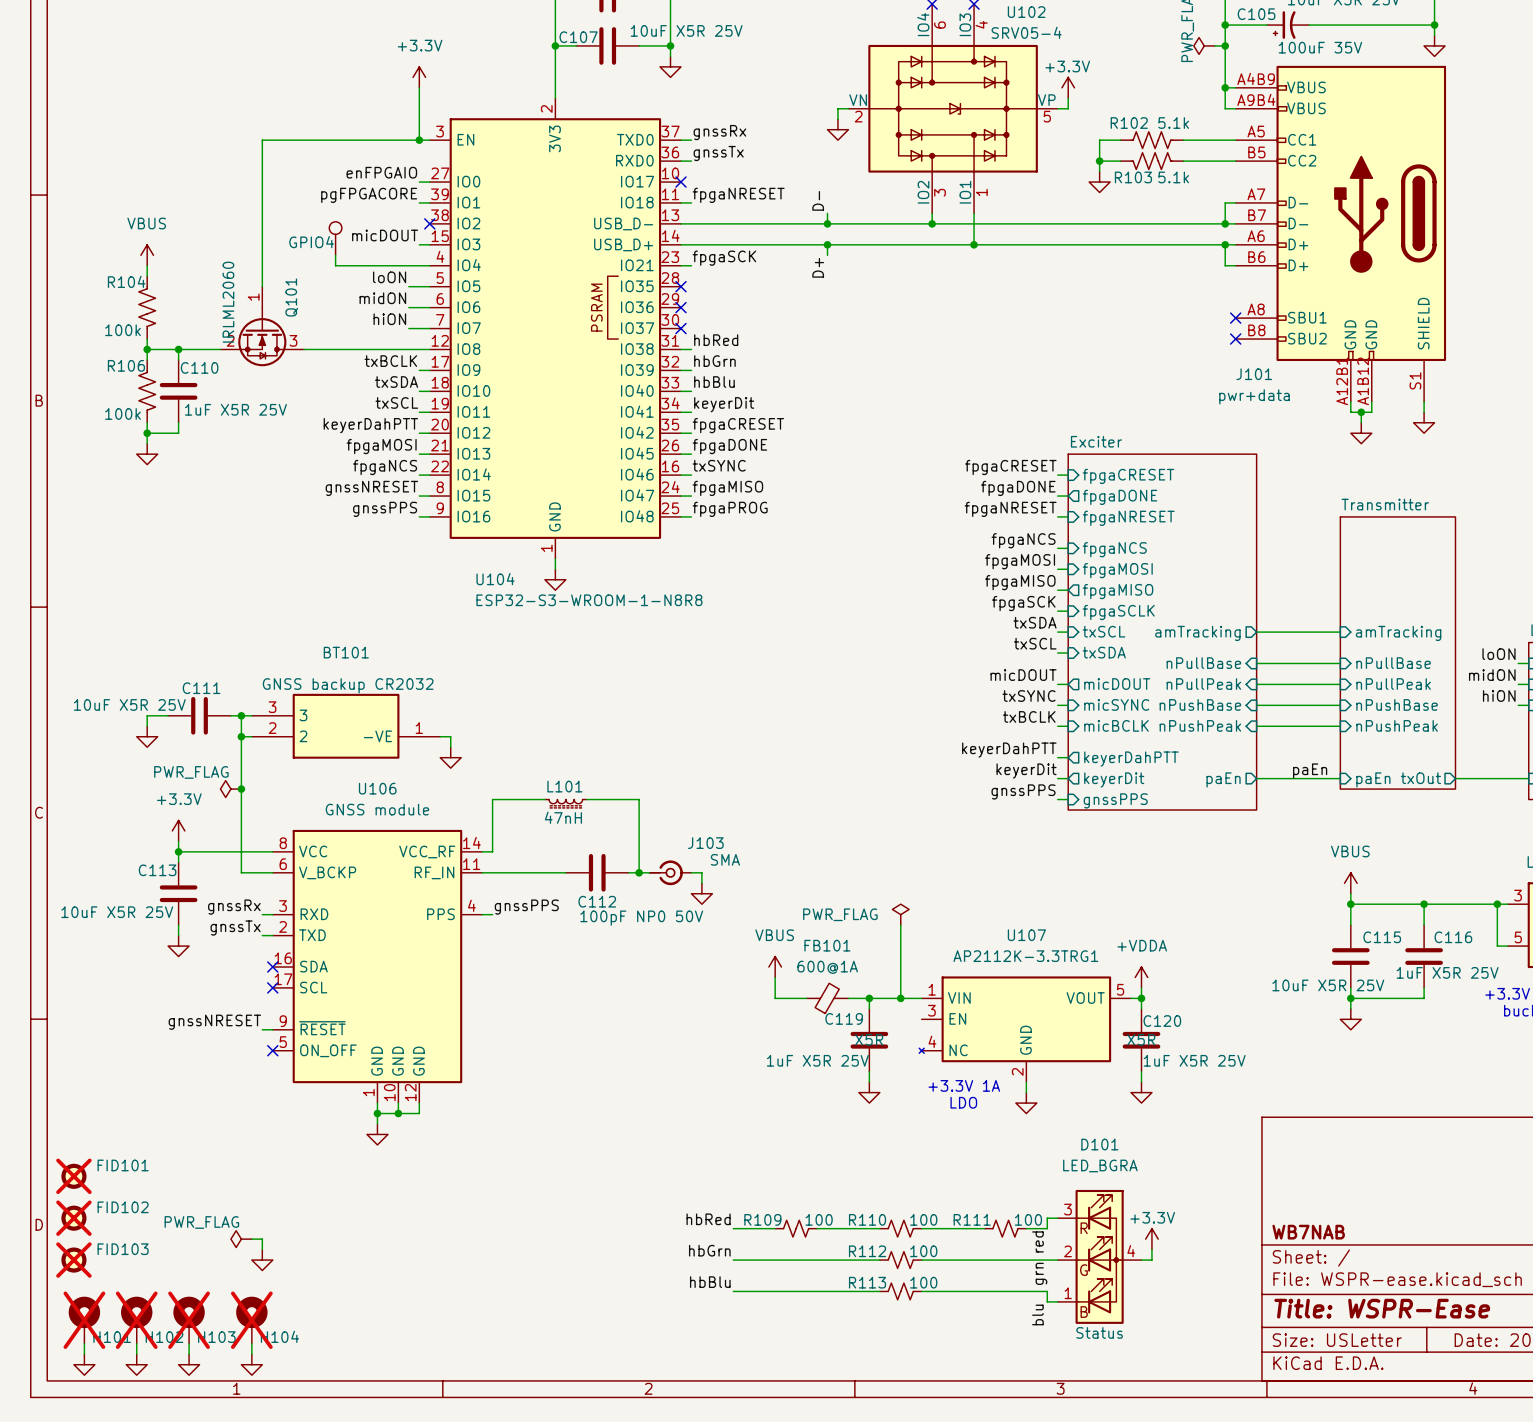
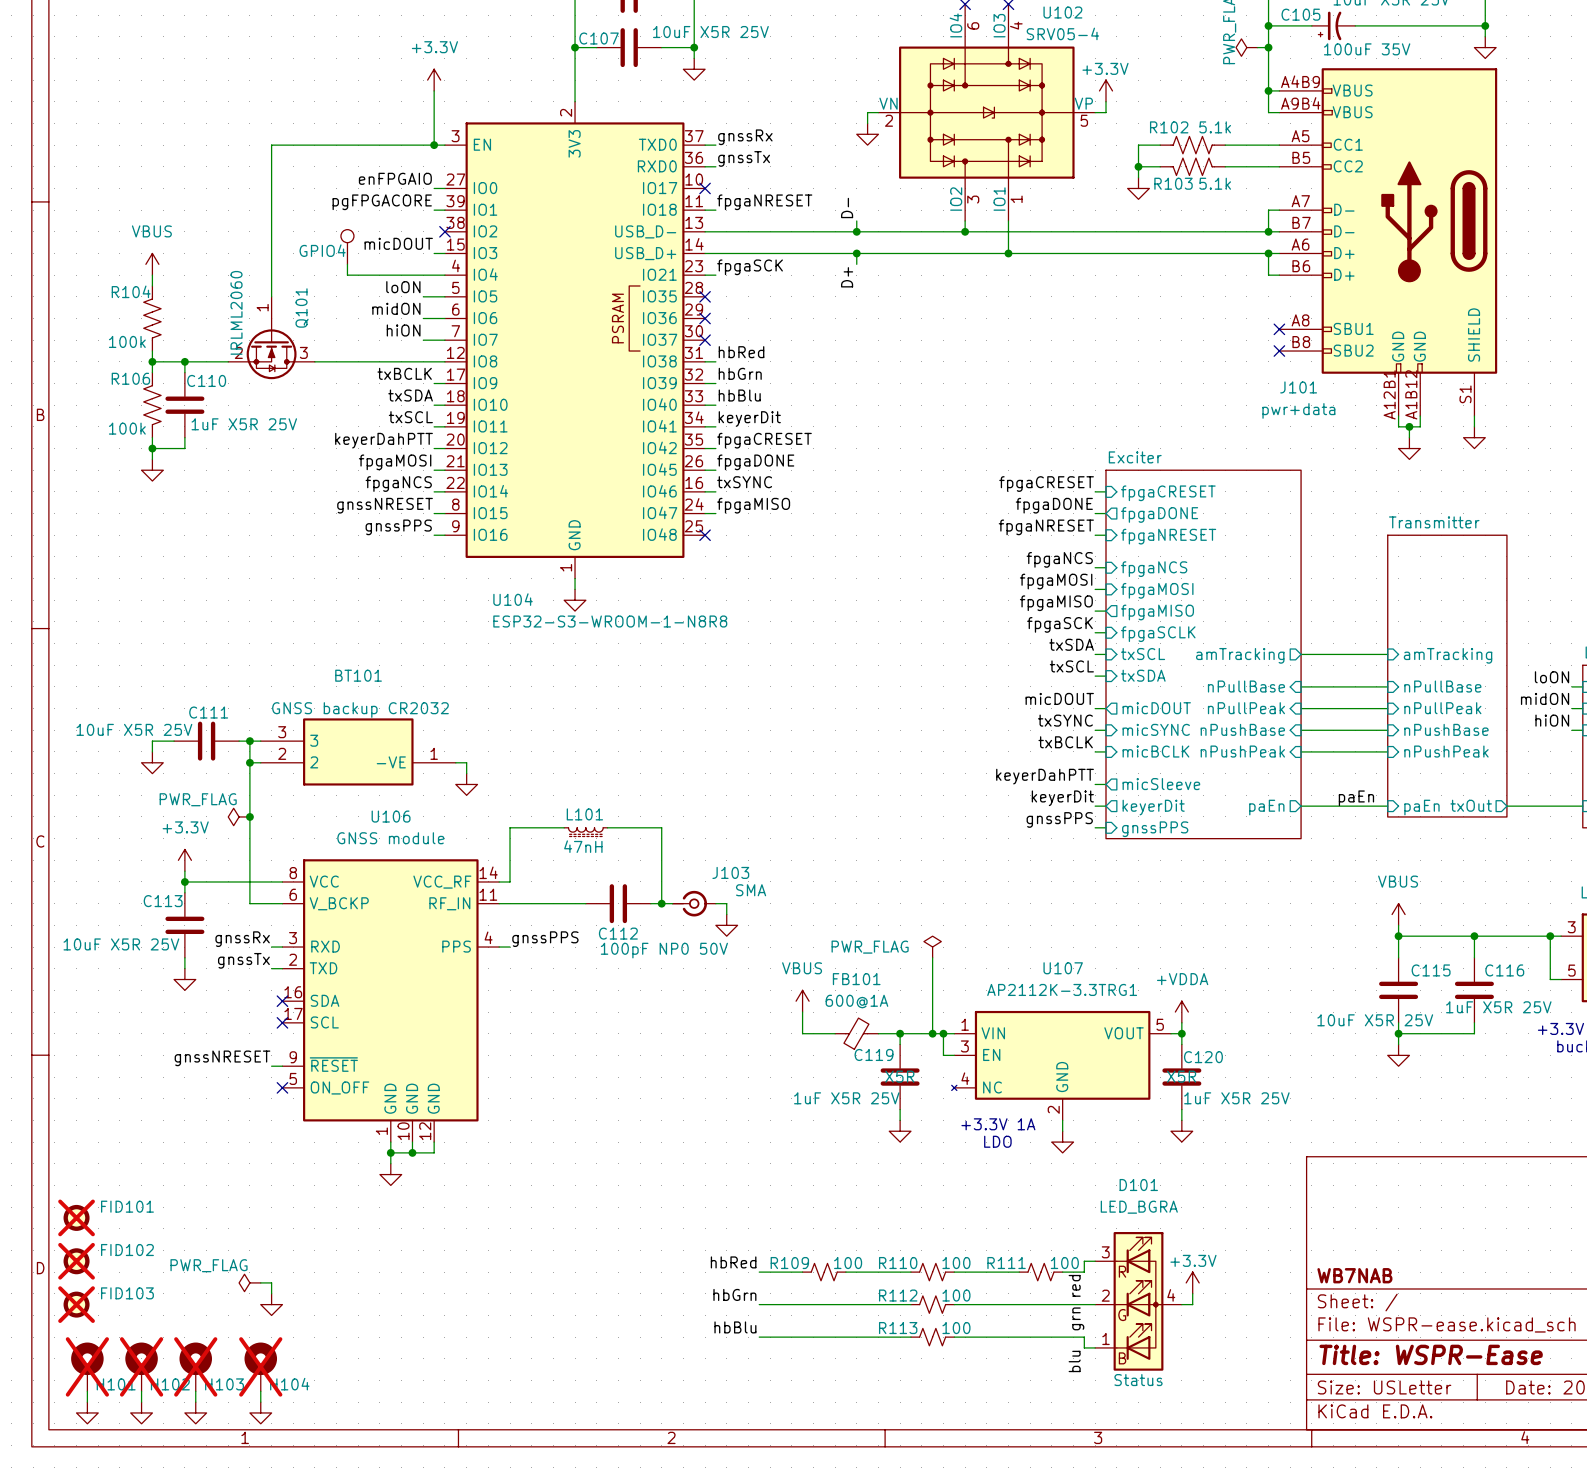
label: fpgaPROG (730, 509) -> none
wire: (680, 516) (691, 516) -> none
no-connect mark: none -> (705, 535)
sheet pin: keyerDahPTT (1131, 759) -> micSleeve (1161, 784)
wire: none -> (943, 1033) (943, 1055) (954, 1055)
junction: none -> (943, 1033)

